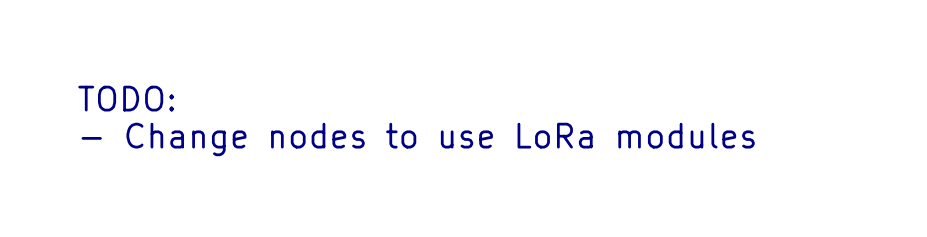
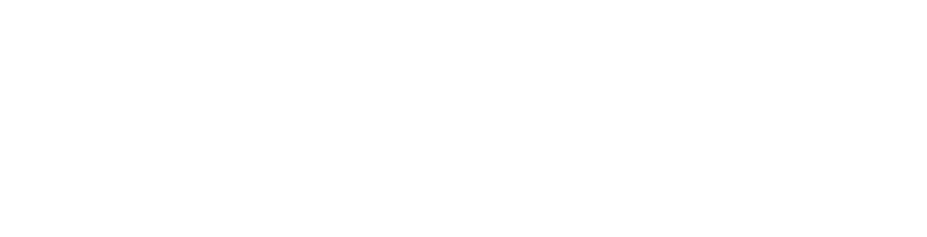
text: TODO: (126, 98) -> none
text: - Change nodes to use LoRa modules (418, 139) -> none

